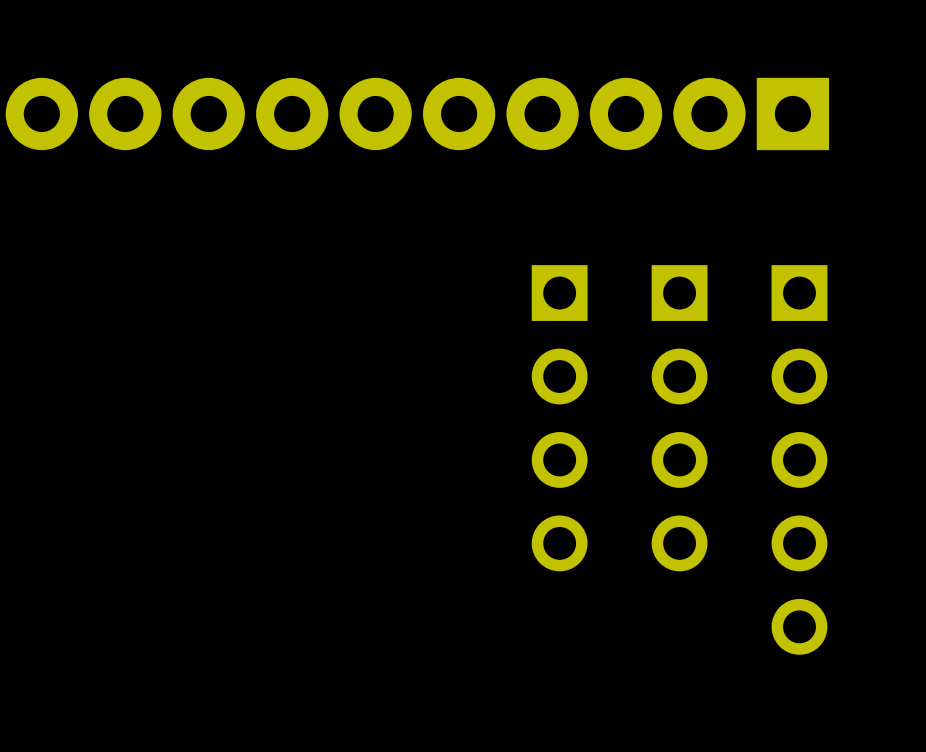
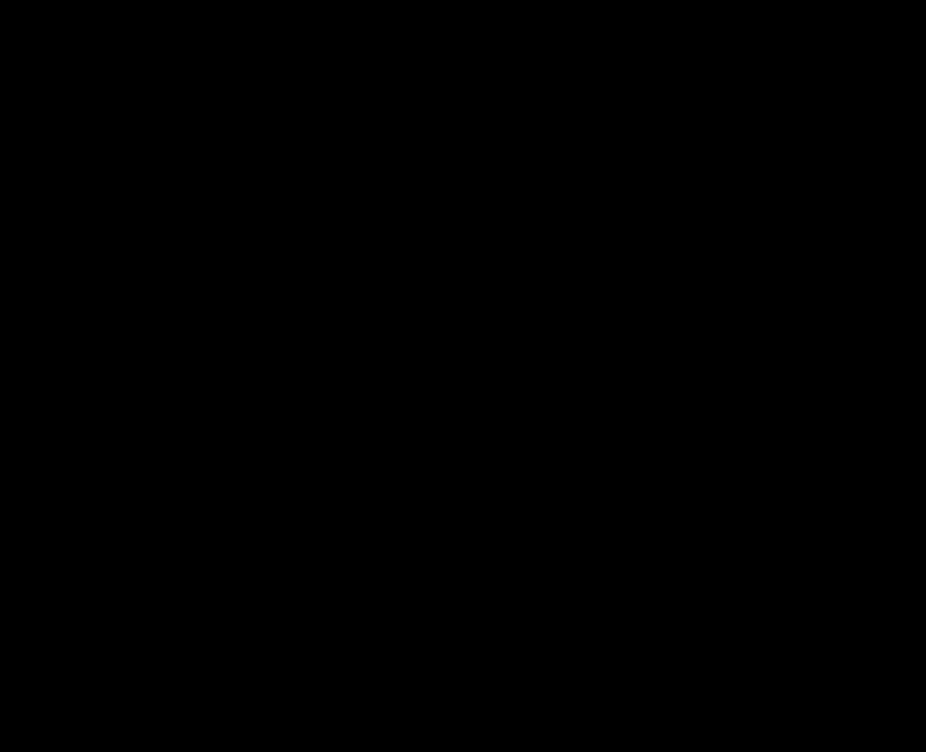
part: (417, 113) -> none
part: (559, 418) -> none
part: (679, 418) -> none
part: (799, 459) -> none

